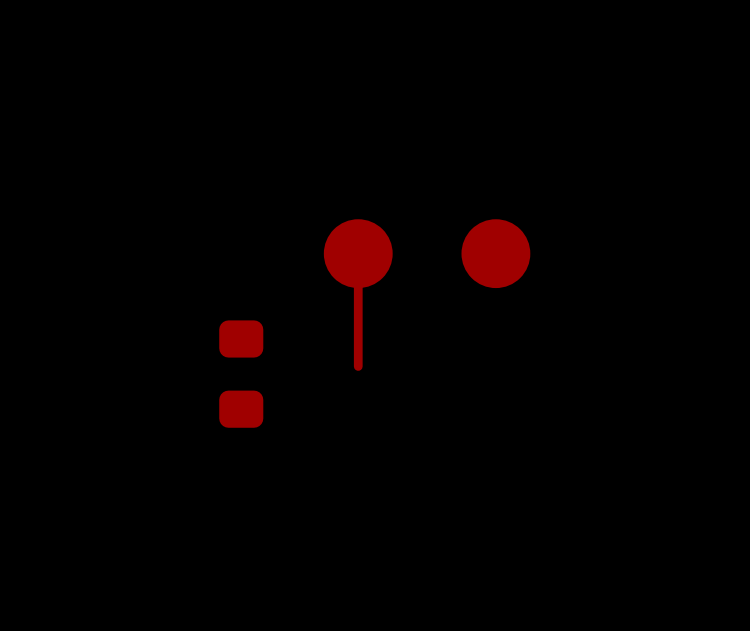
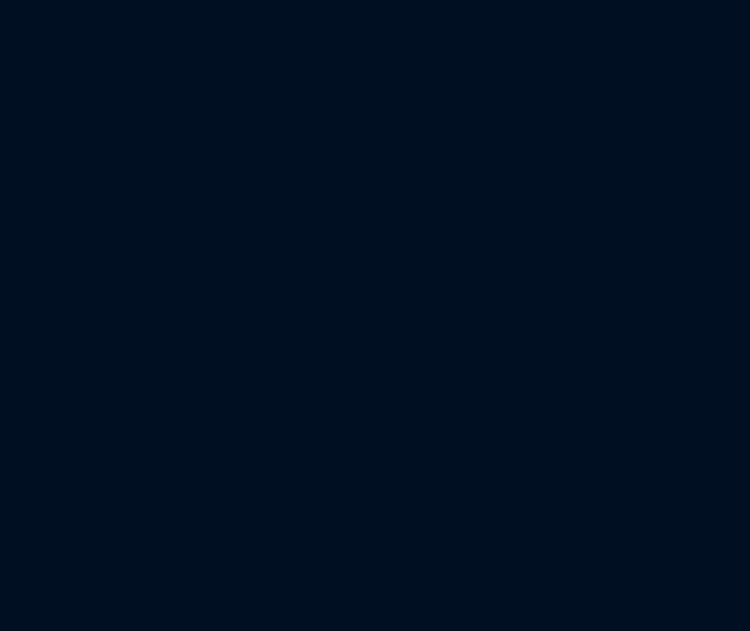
top track: (358, 253) (358, 366) -> none
part: (358, 253) -> none
part: (495, 253) -> none
part: (241, 374) -> none

